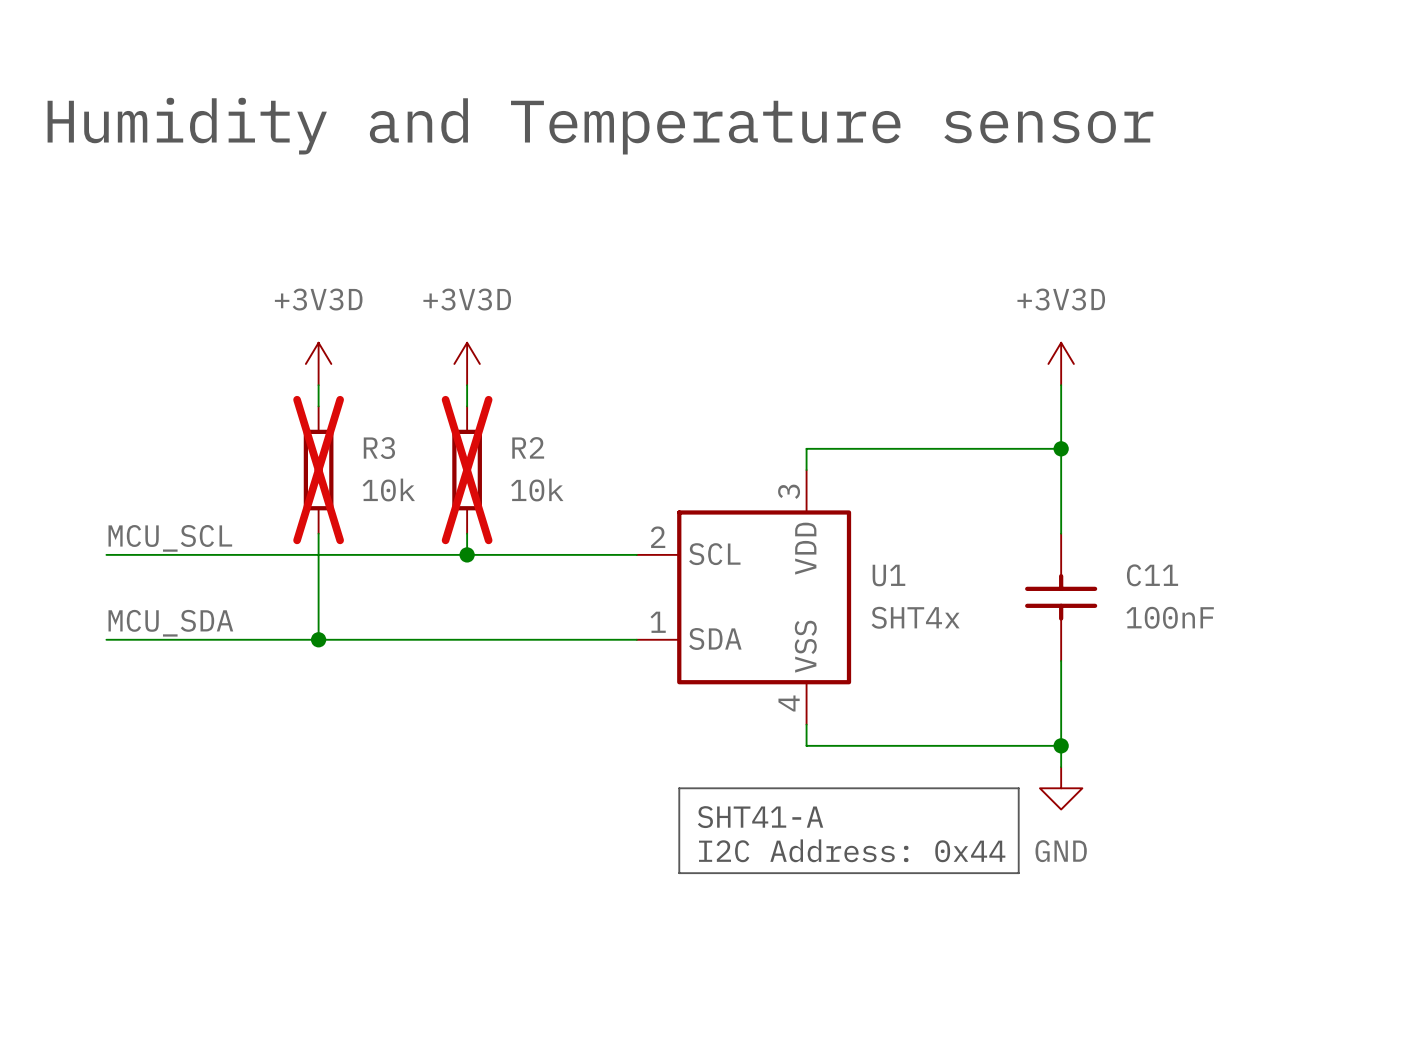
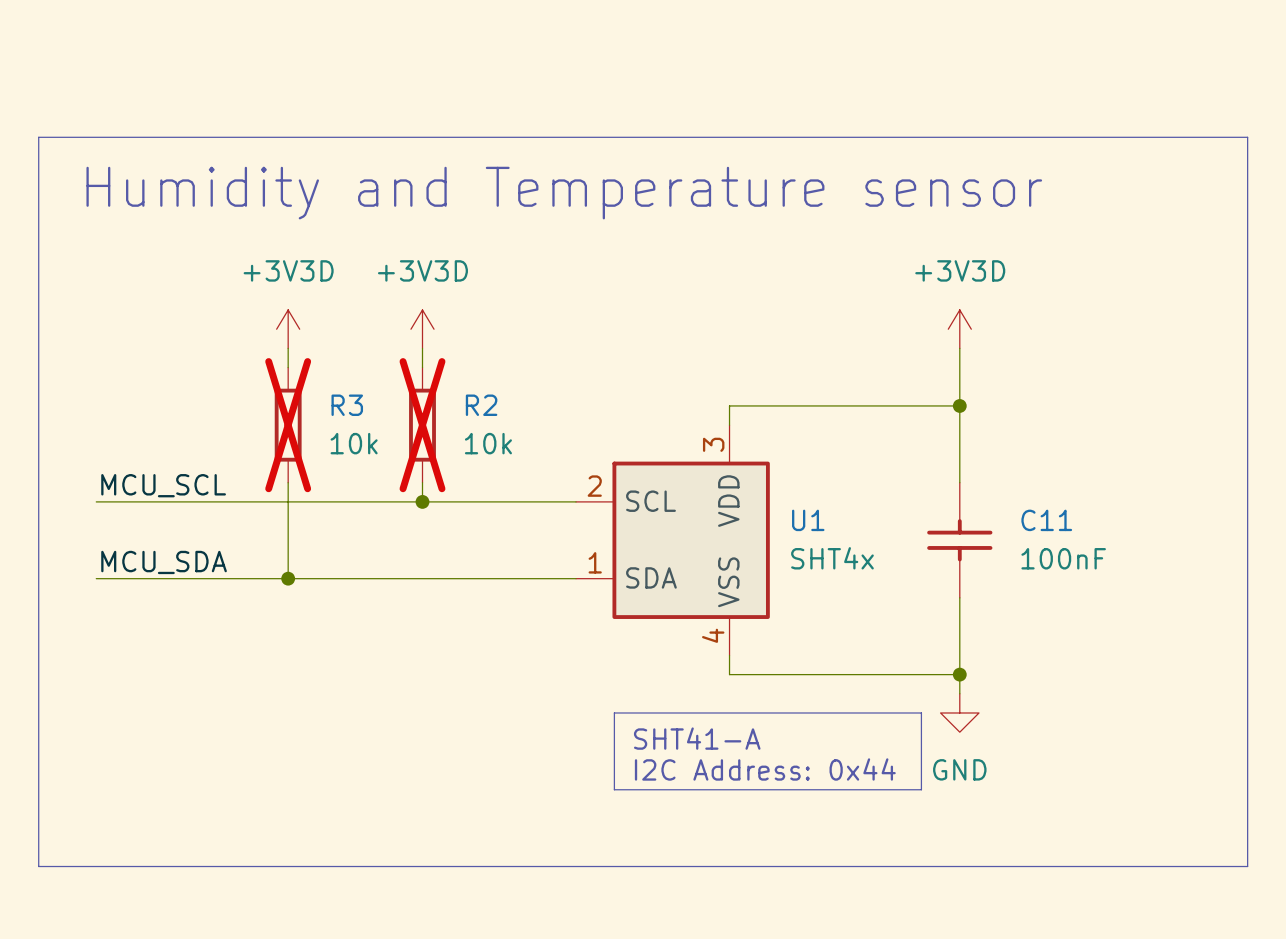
text position: Humidity and Temperature sensor (600, 126) -> Humidity and Temperature sensor (564, 193)
line: none -> (38, 137) (38, 866) (1247, 866) (1247, 137) (38, 137)

